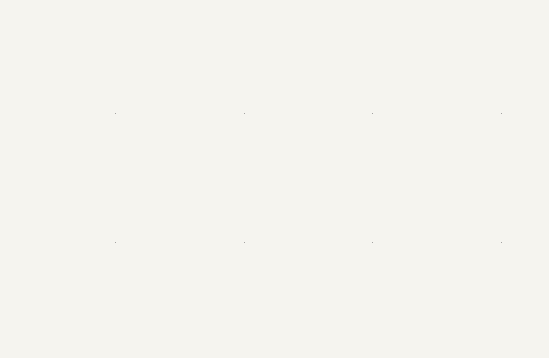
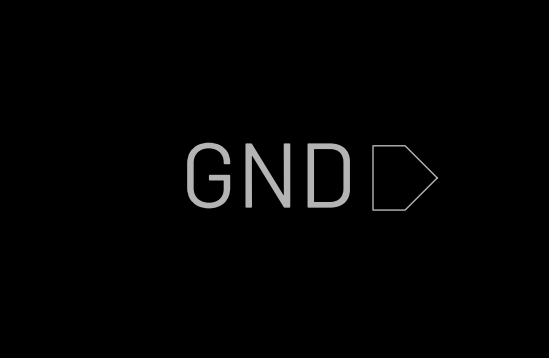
hierarchical label: none -> GND (268, 175)

